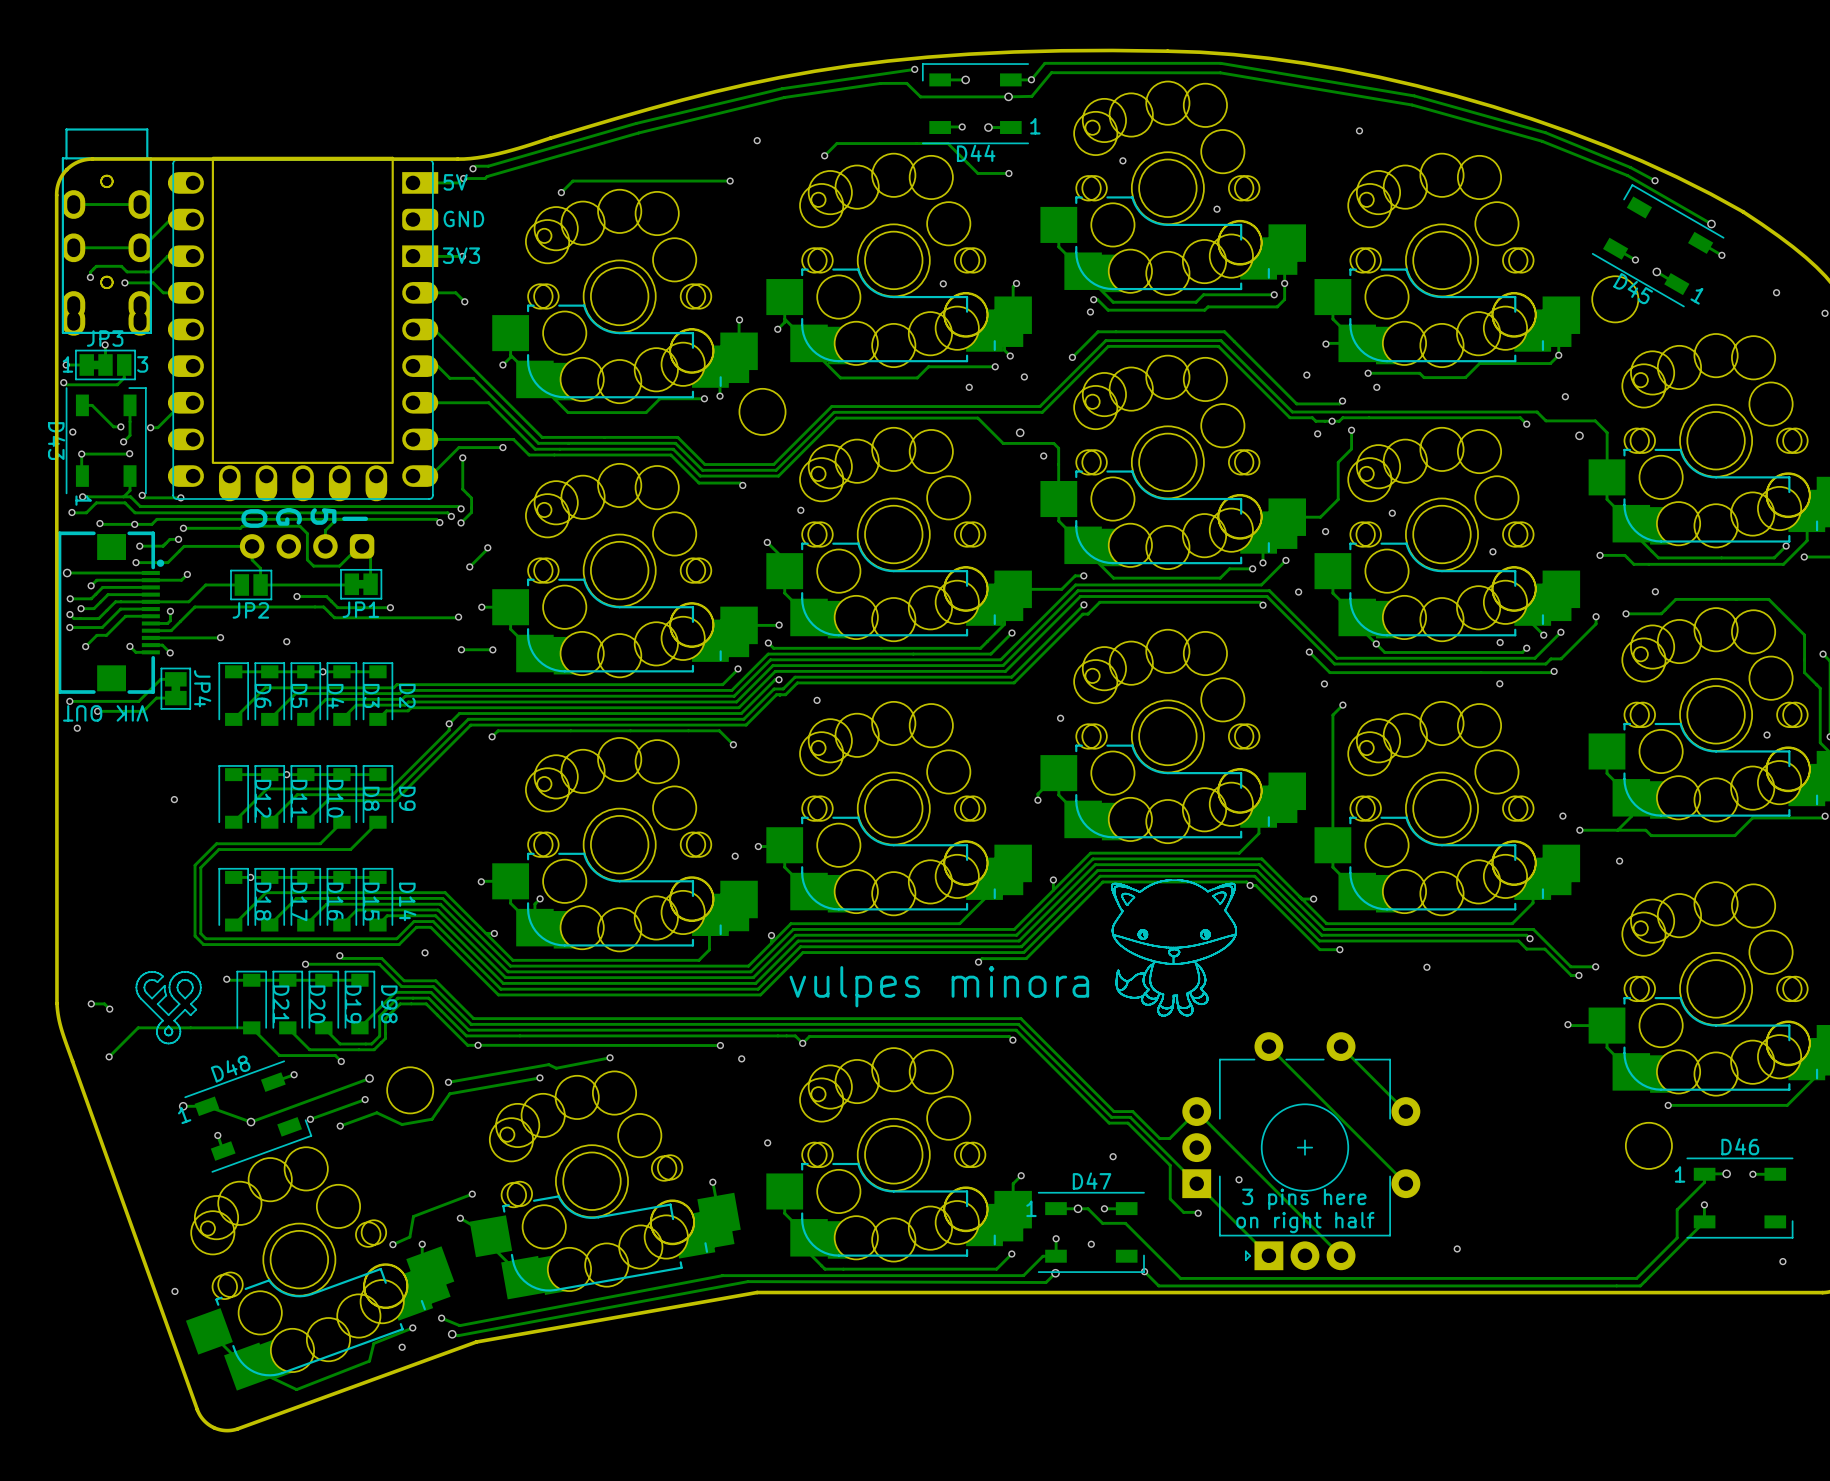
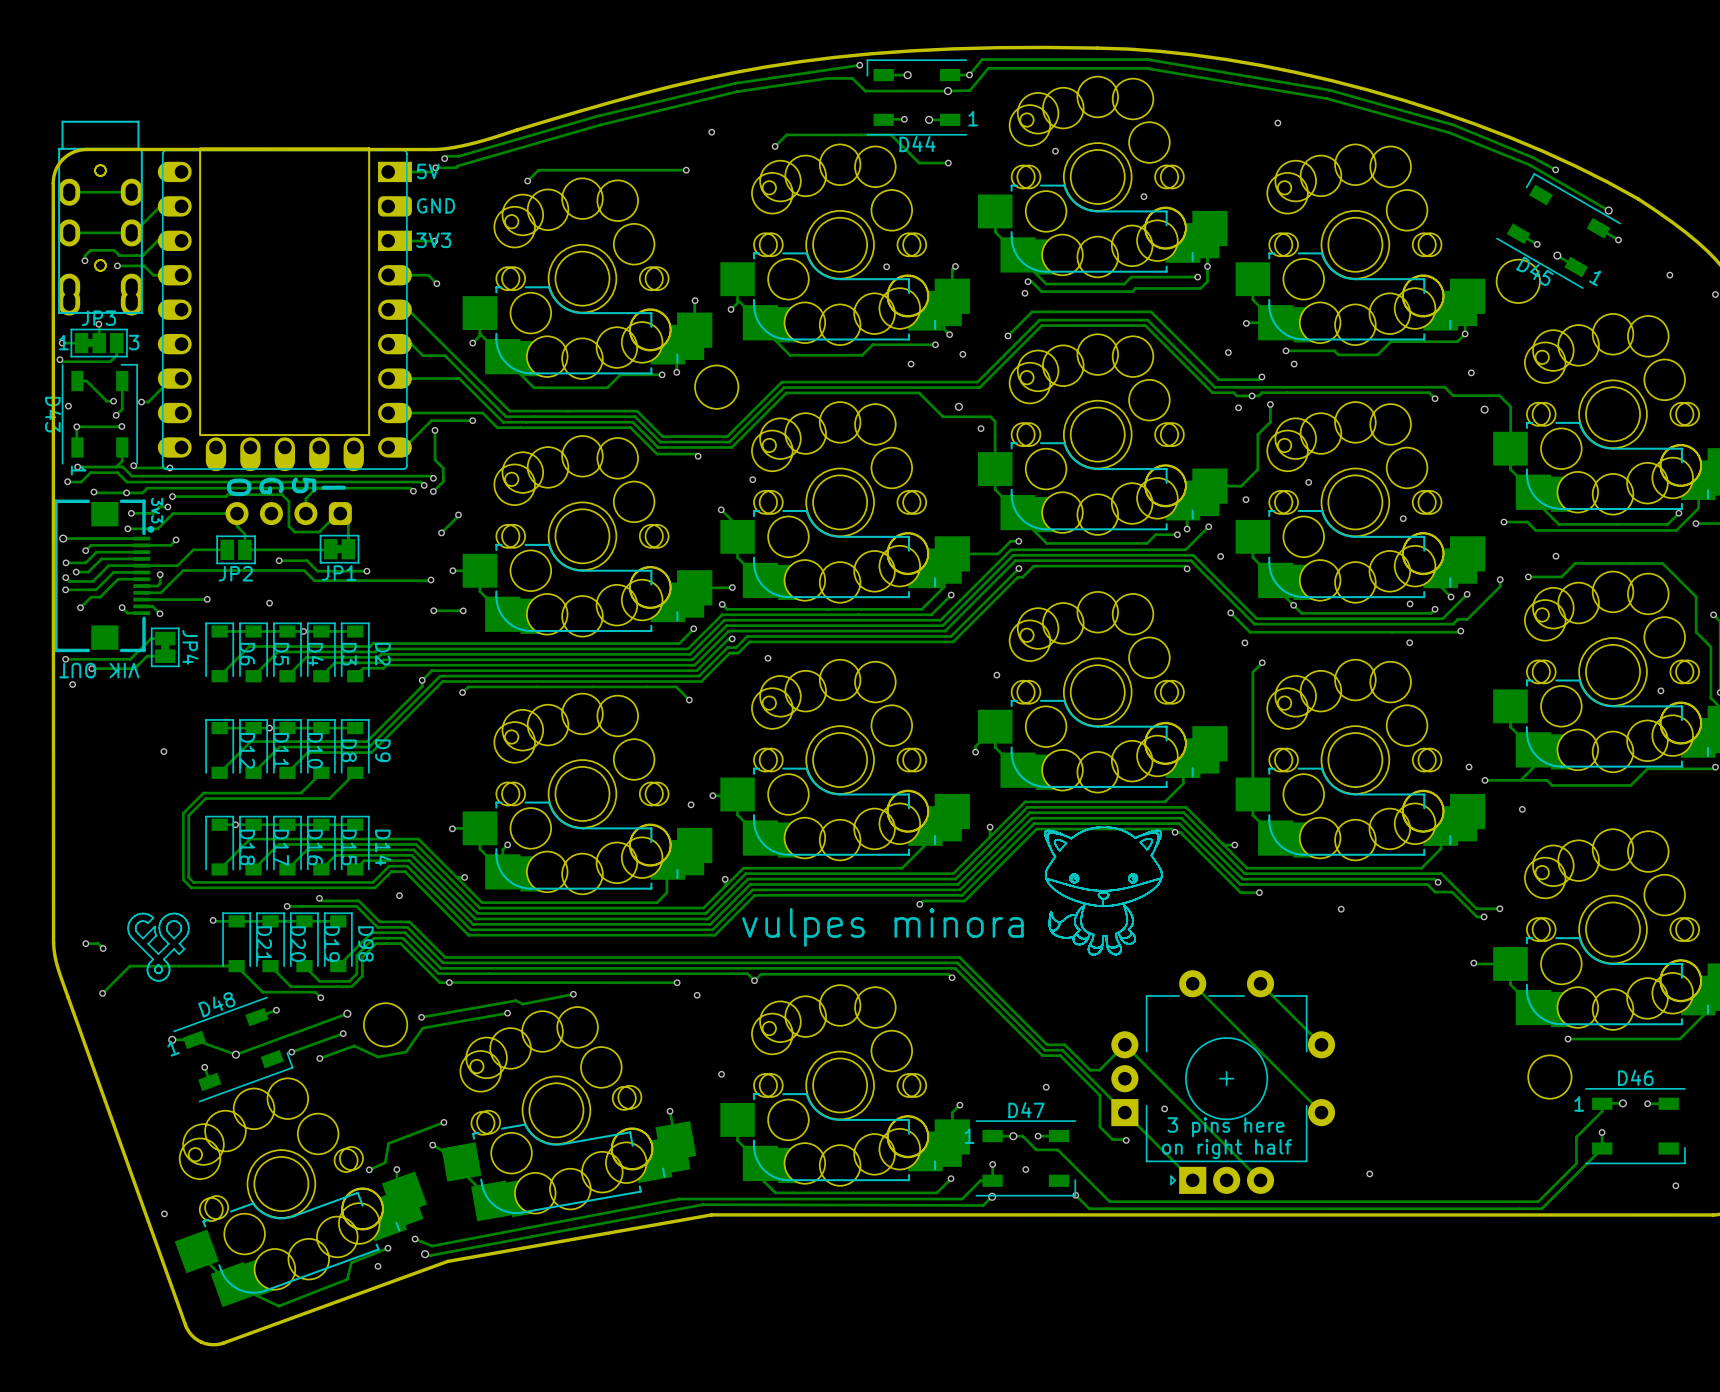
part text: none -> 3v3 (157, 510)

